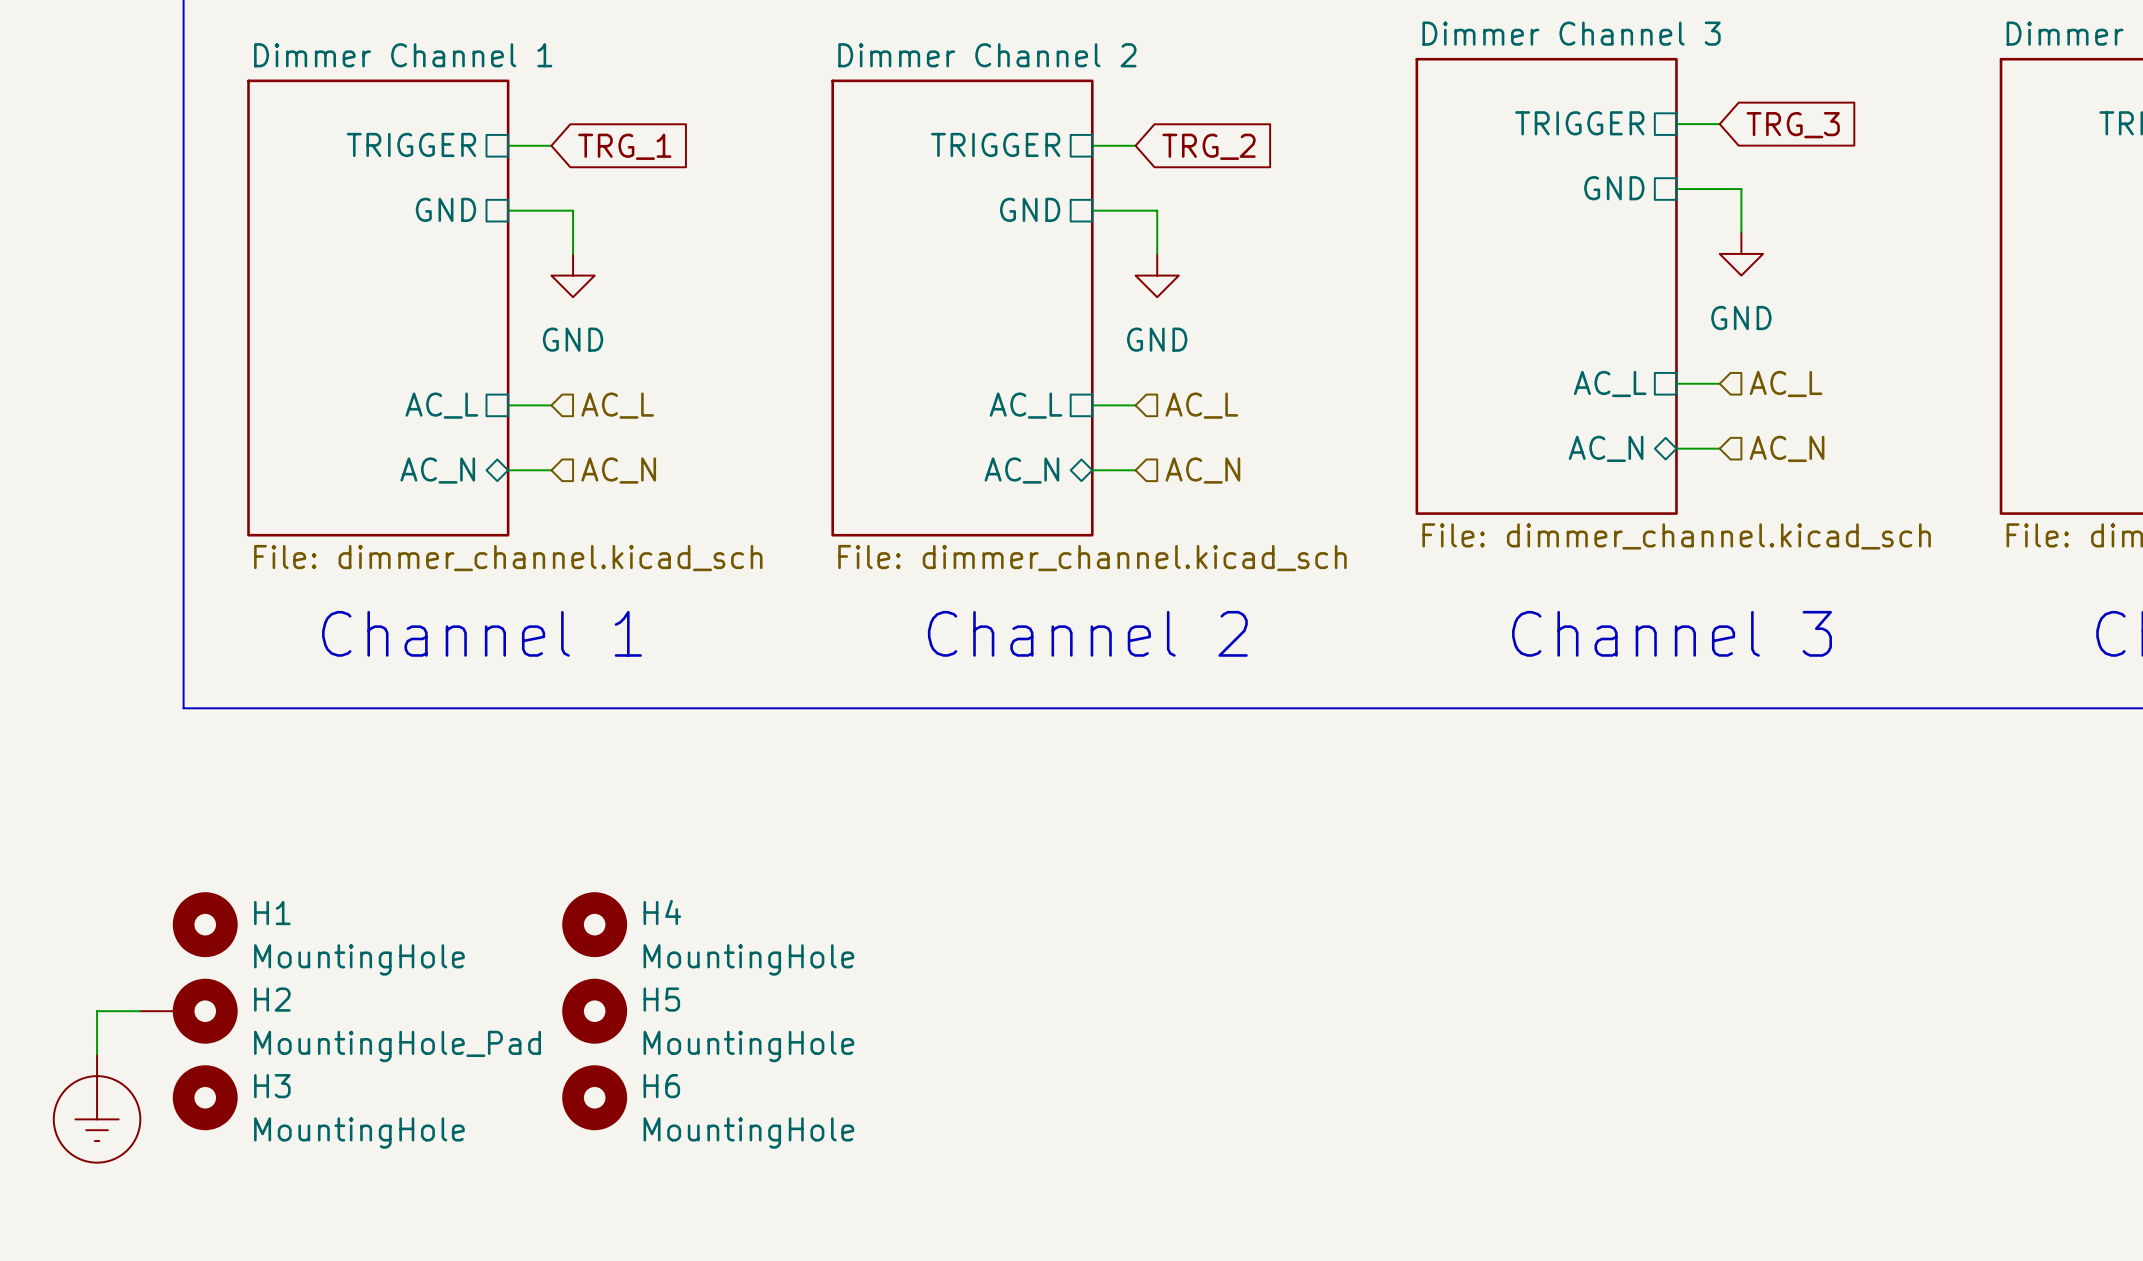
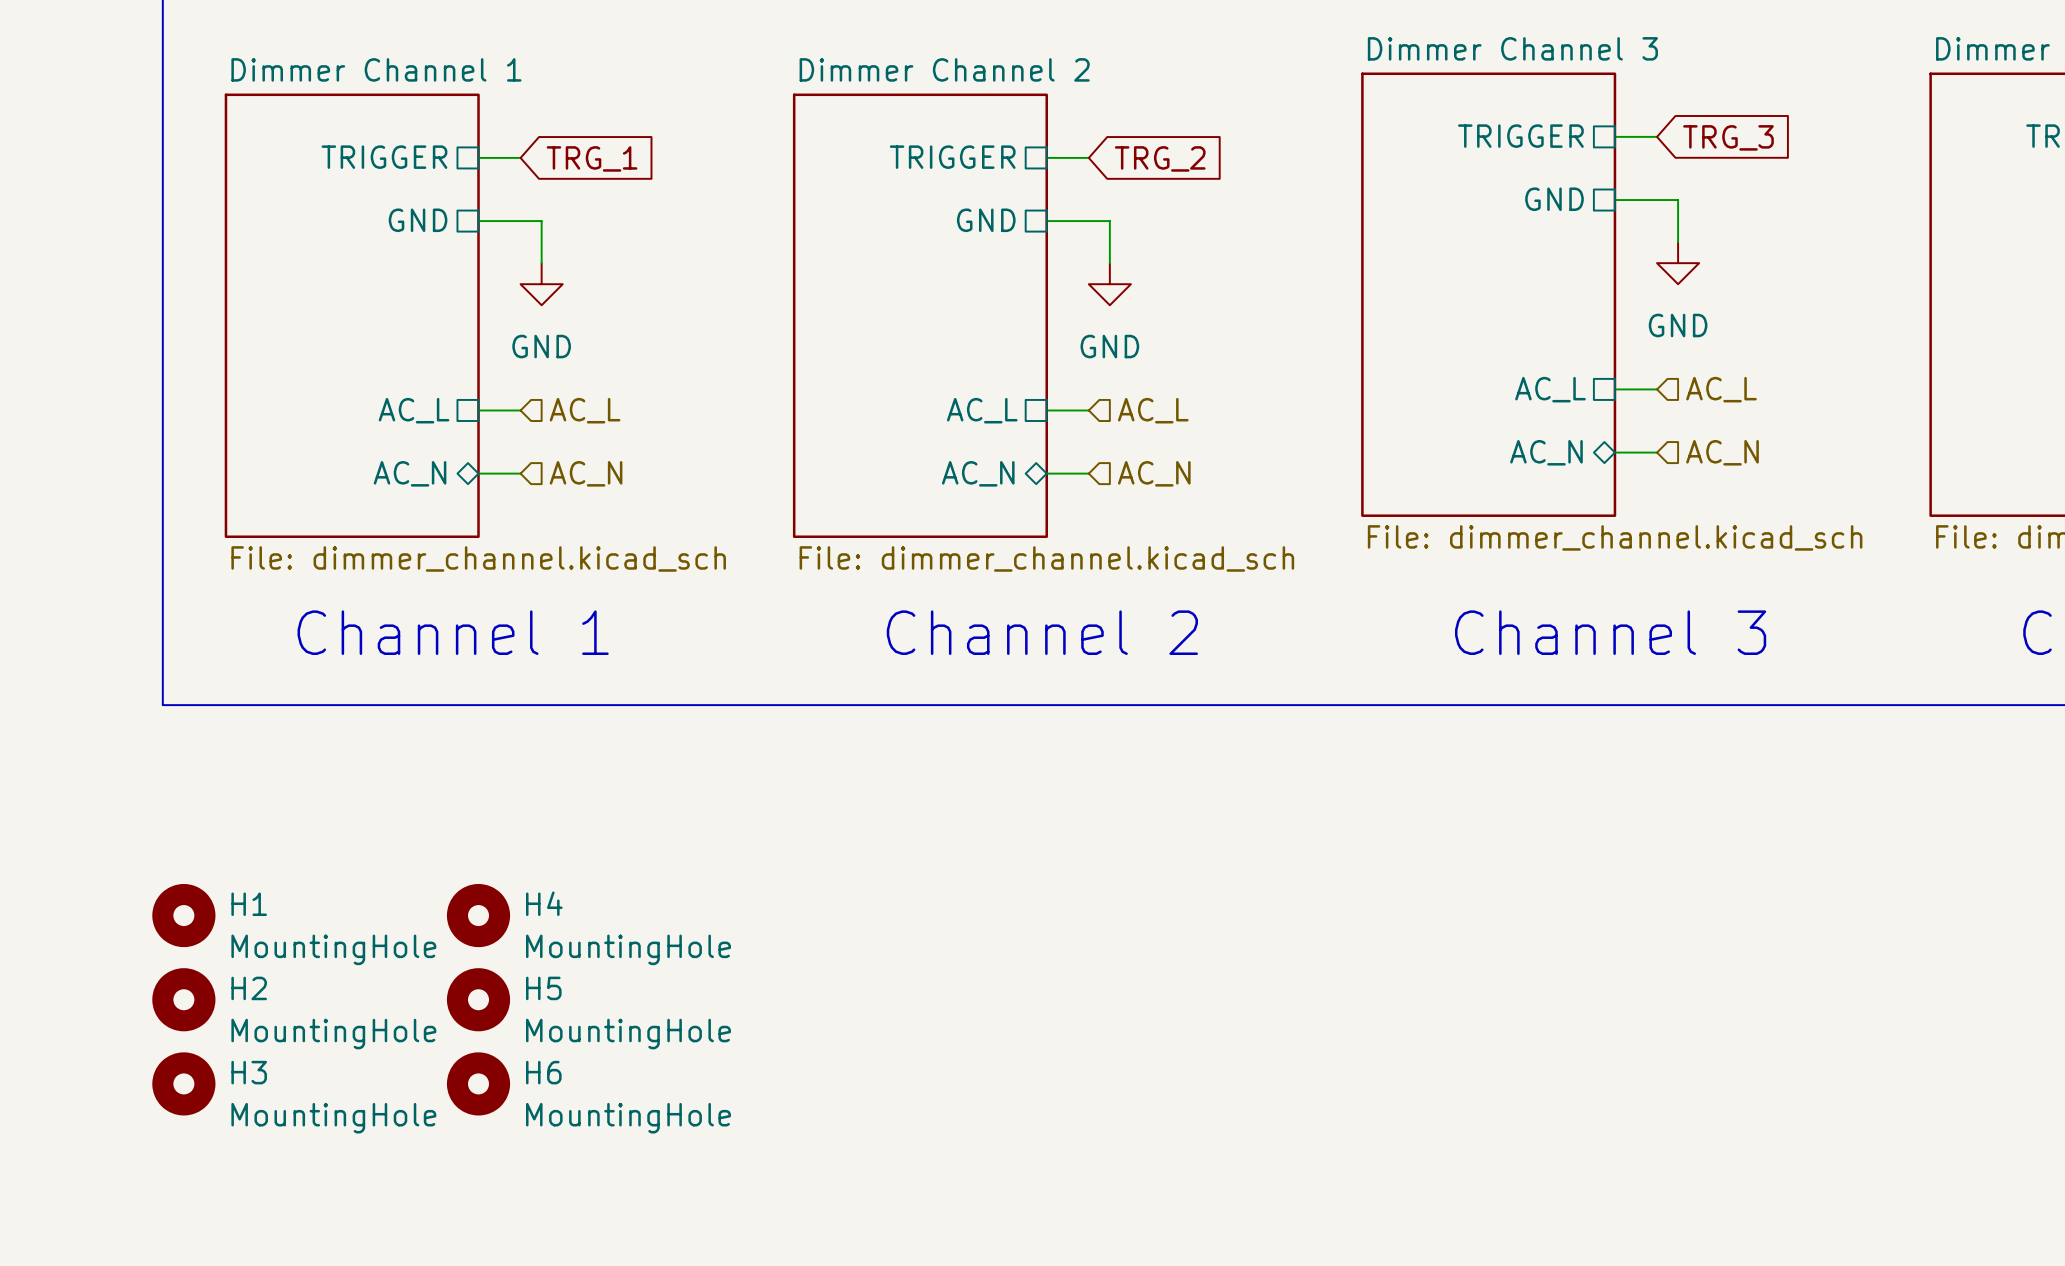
H4 position: (594, 924) -> (478, 915)
H2 symbol: [140, 978, 238, 1044] -> [152, 968, 216, 1032]
wire: (140, 1011) (97, 1011) (97, 1054) -> none
H5 position: (594, 1011) -> (478, 999)
H2 value: MountingHole_Pad (397, 1046) -> MountingHole (333, 1034)
H6 position: (594, 1097) -> (478, 1083)
power symbol: (97, 1108) -> none

